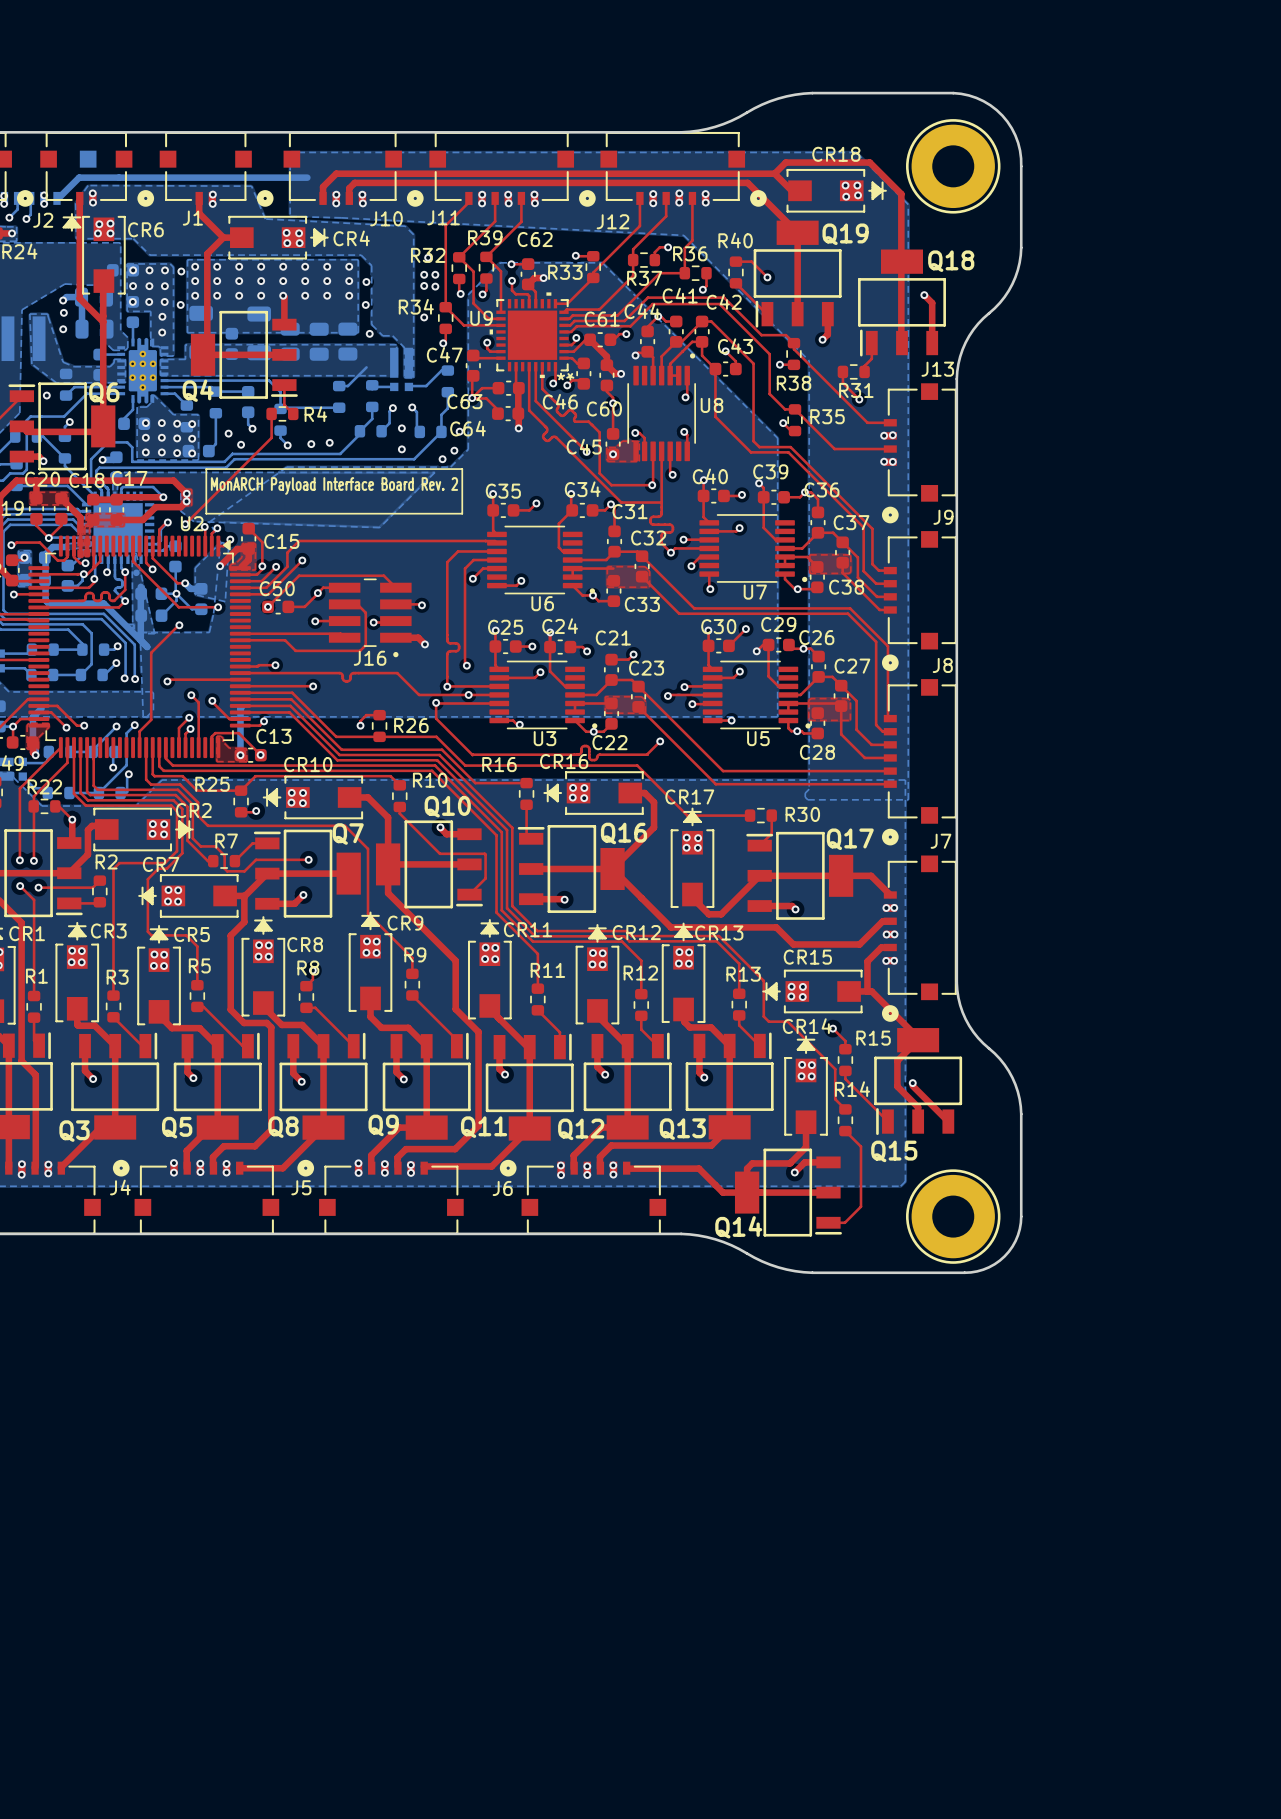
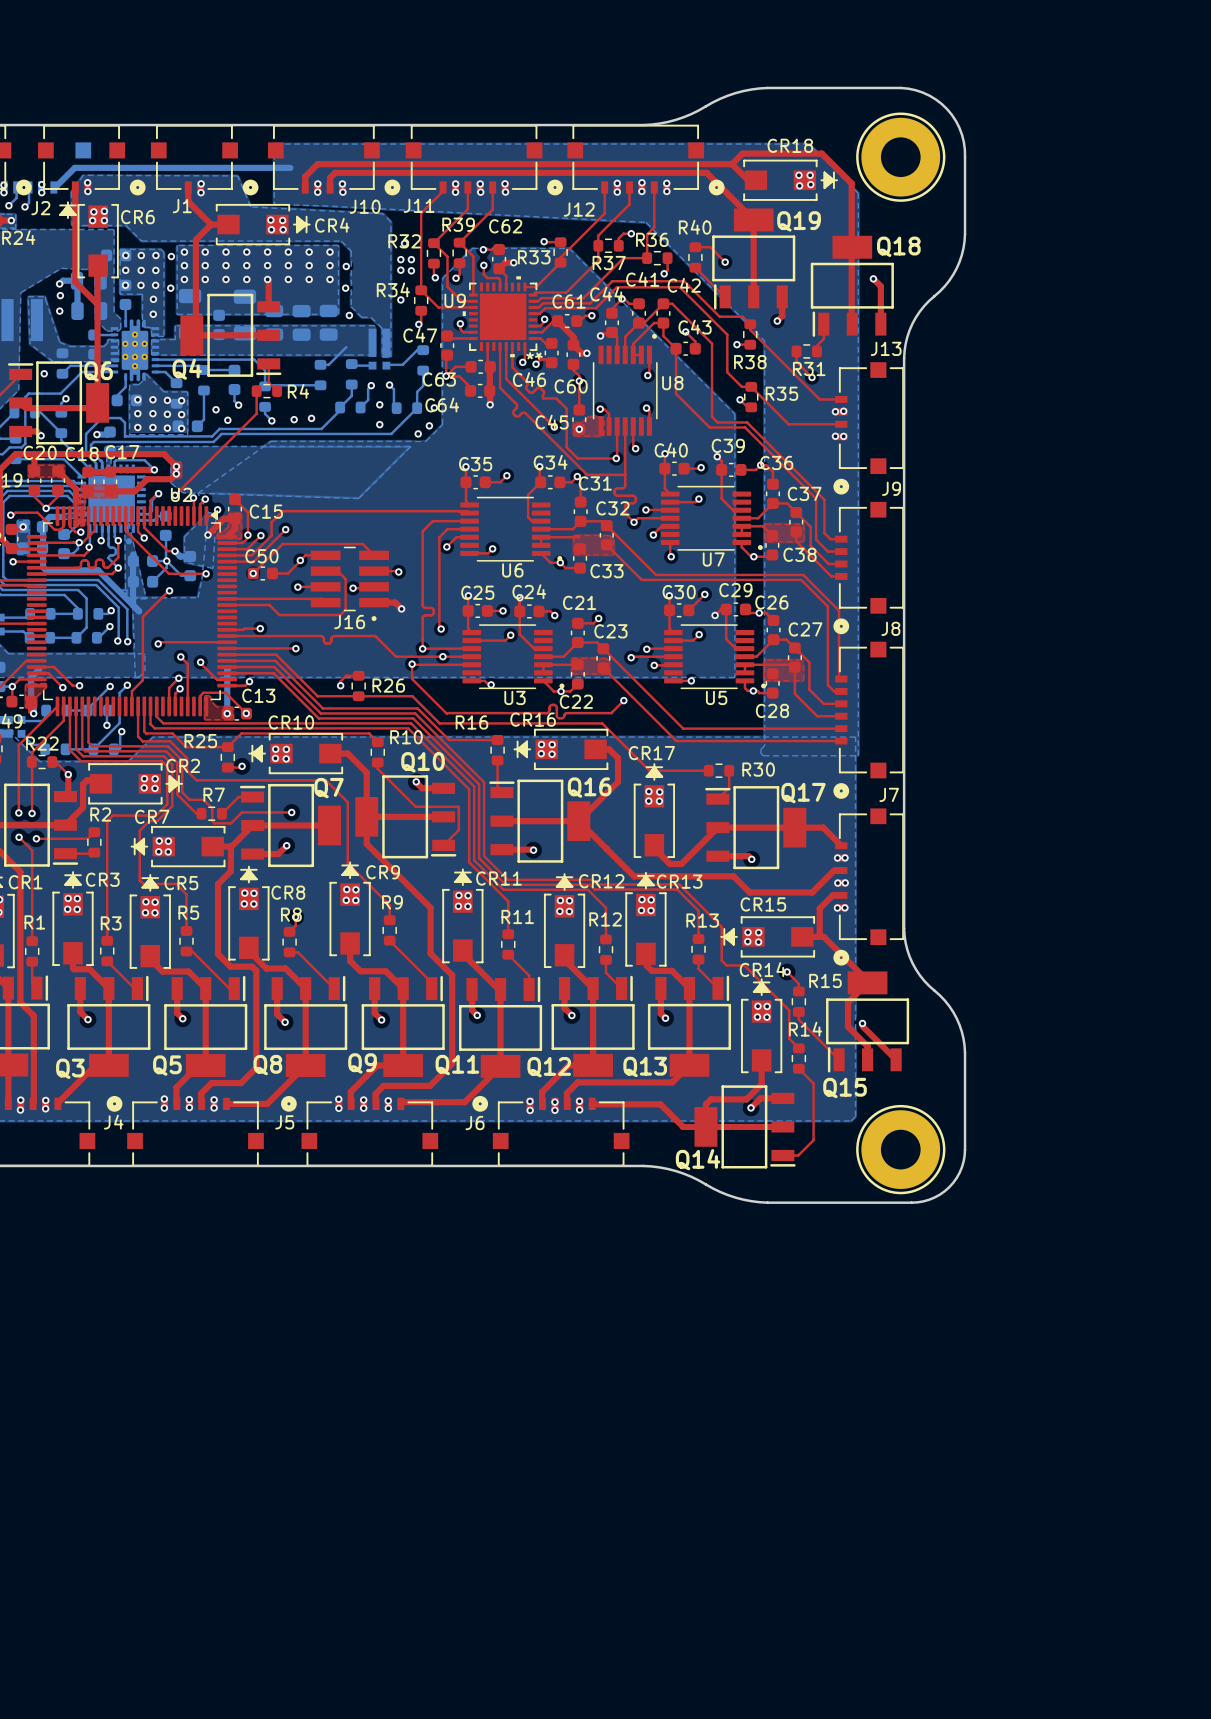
line: (206, 469) (462, 469) (462, 513) (206, 513) (206, 469) -> none
text: MonARCH Payload Interface Board Rev. 2 (334, 485) -> none

